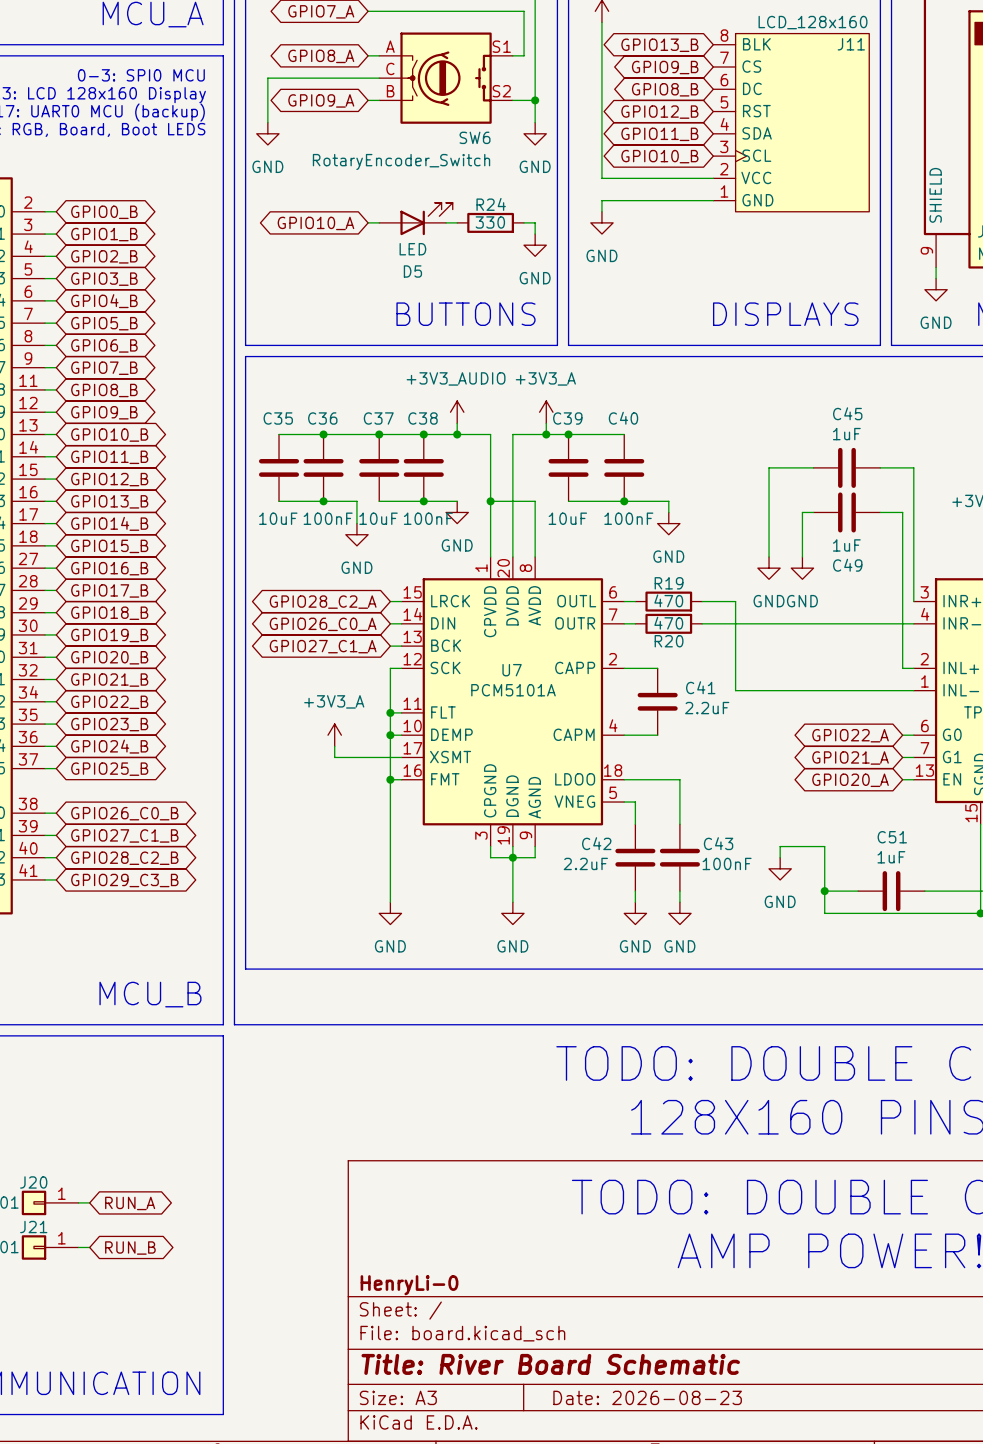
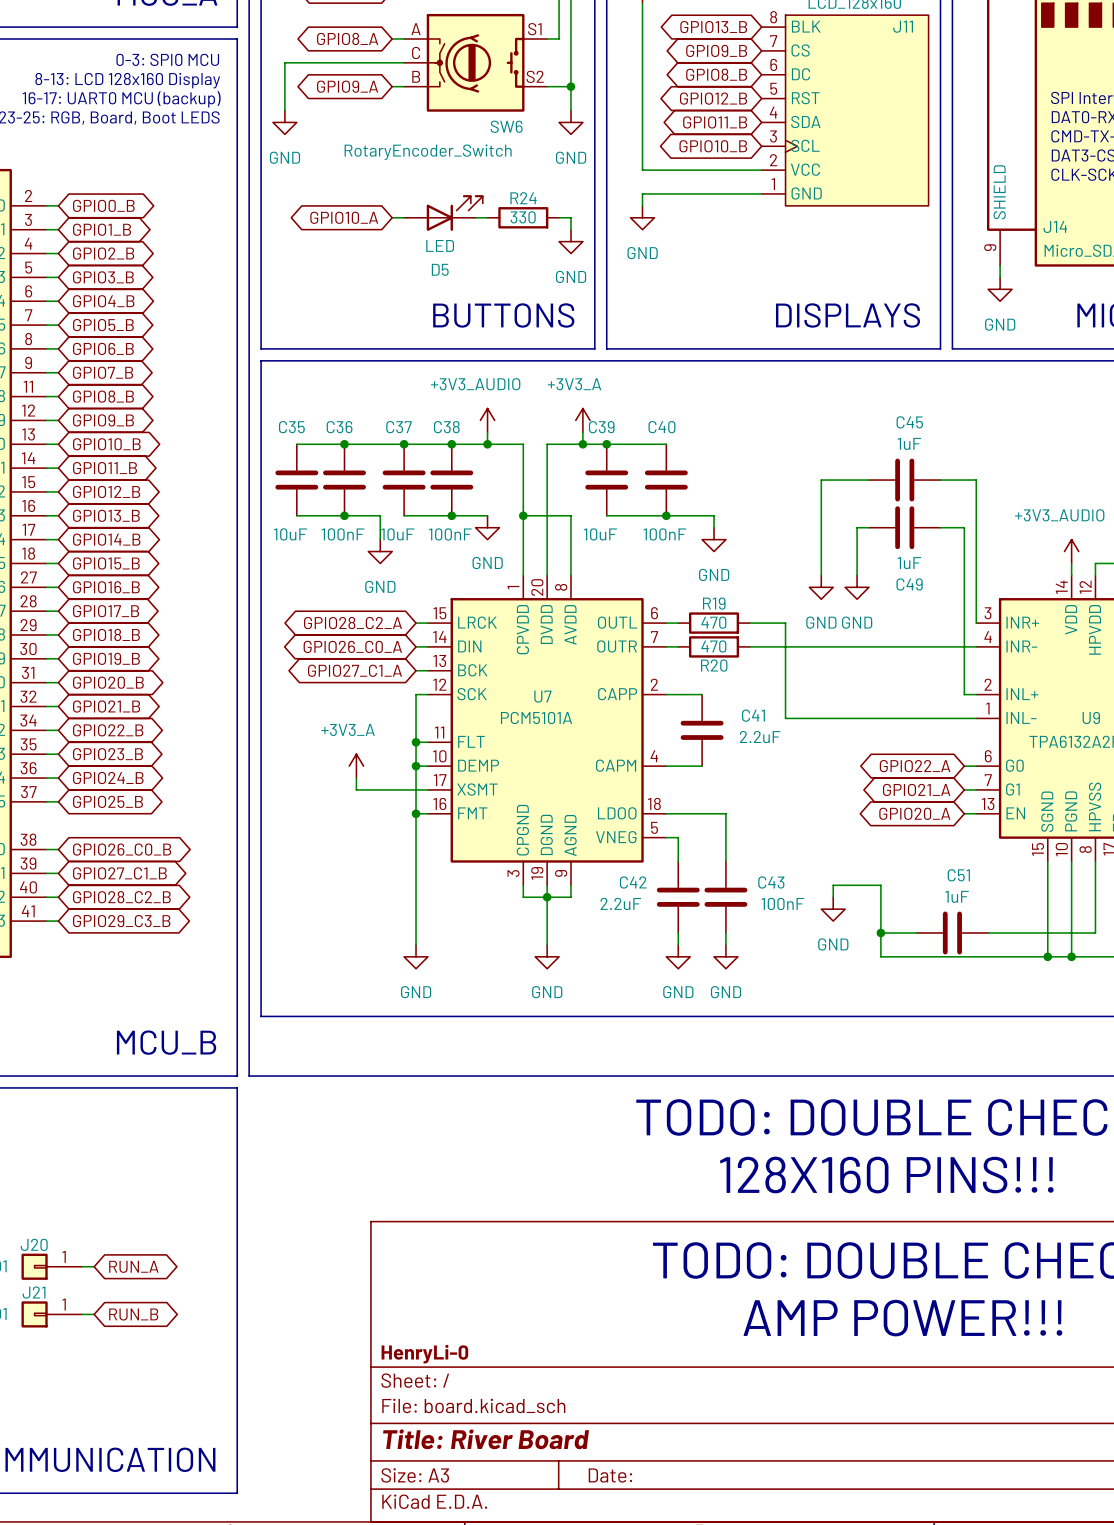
title block: Title: River Board Schematic (550, 1364) -> Title: River Board (486, 1439)
title block: Date: 2026-08-23 (647, 1397) -> Date: (610, 1475)

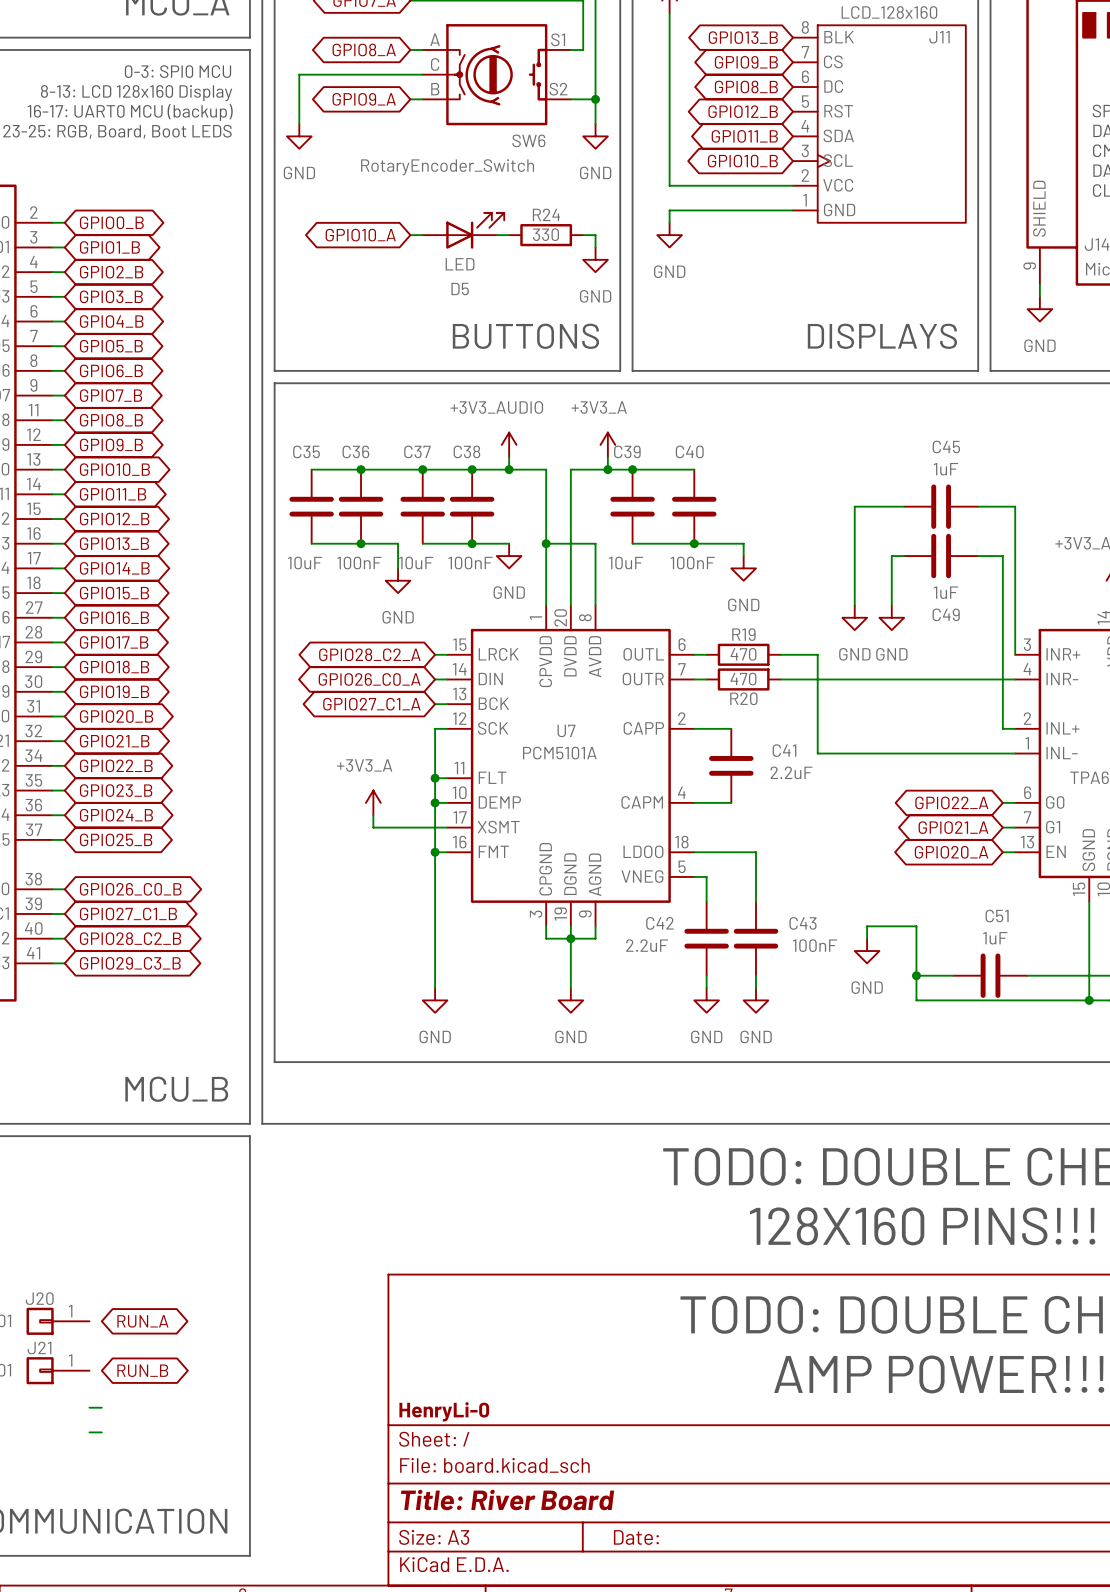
wire: (82, 1266) (94, 1266) -> (89, 1432) (101, 1432)
wire: (82, 1314) (94, 1314) -> (89, 1407) (101, 1407)

